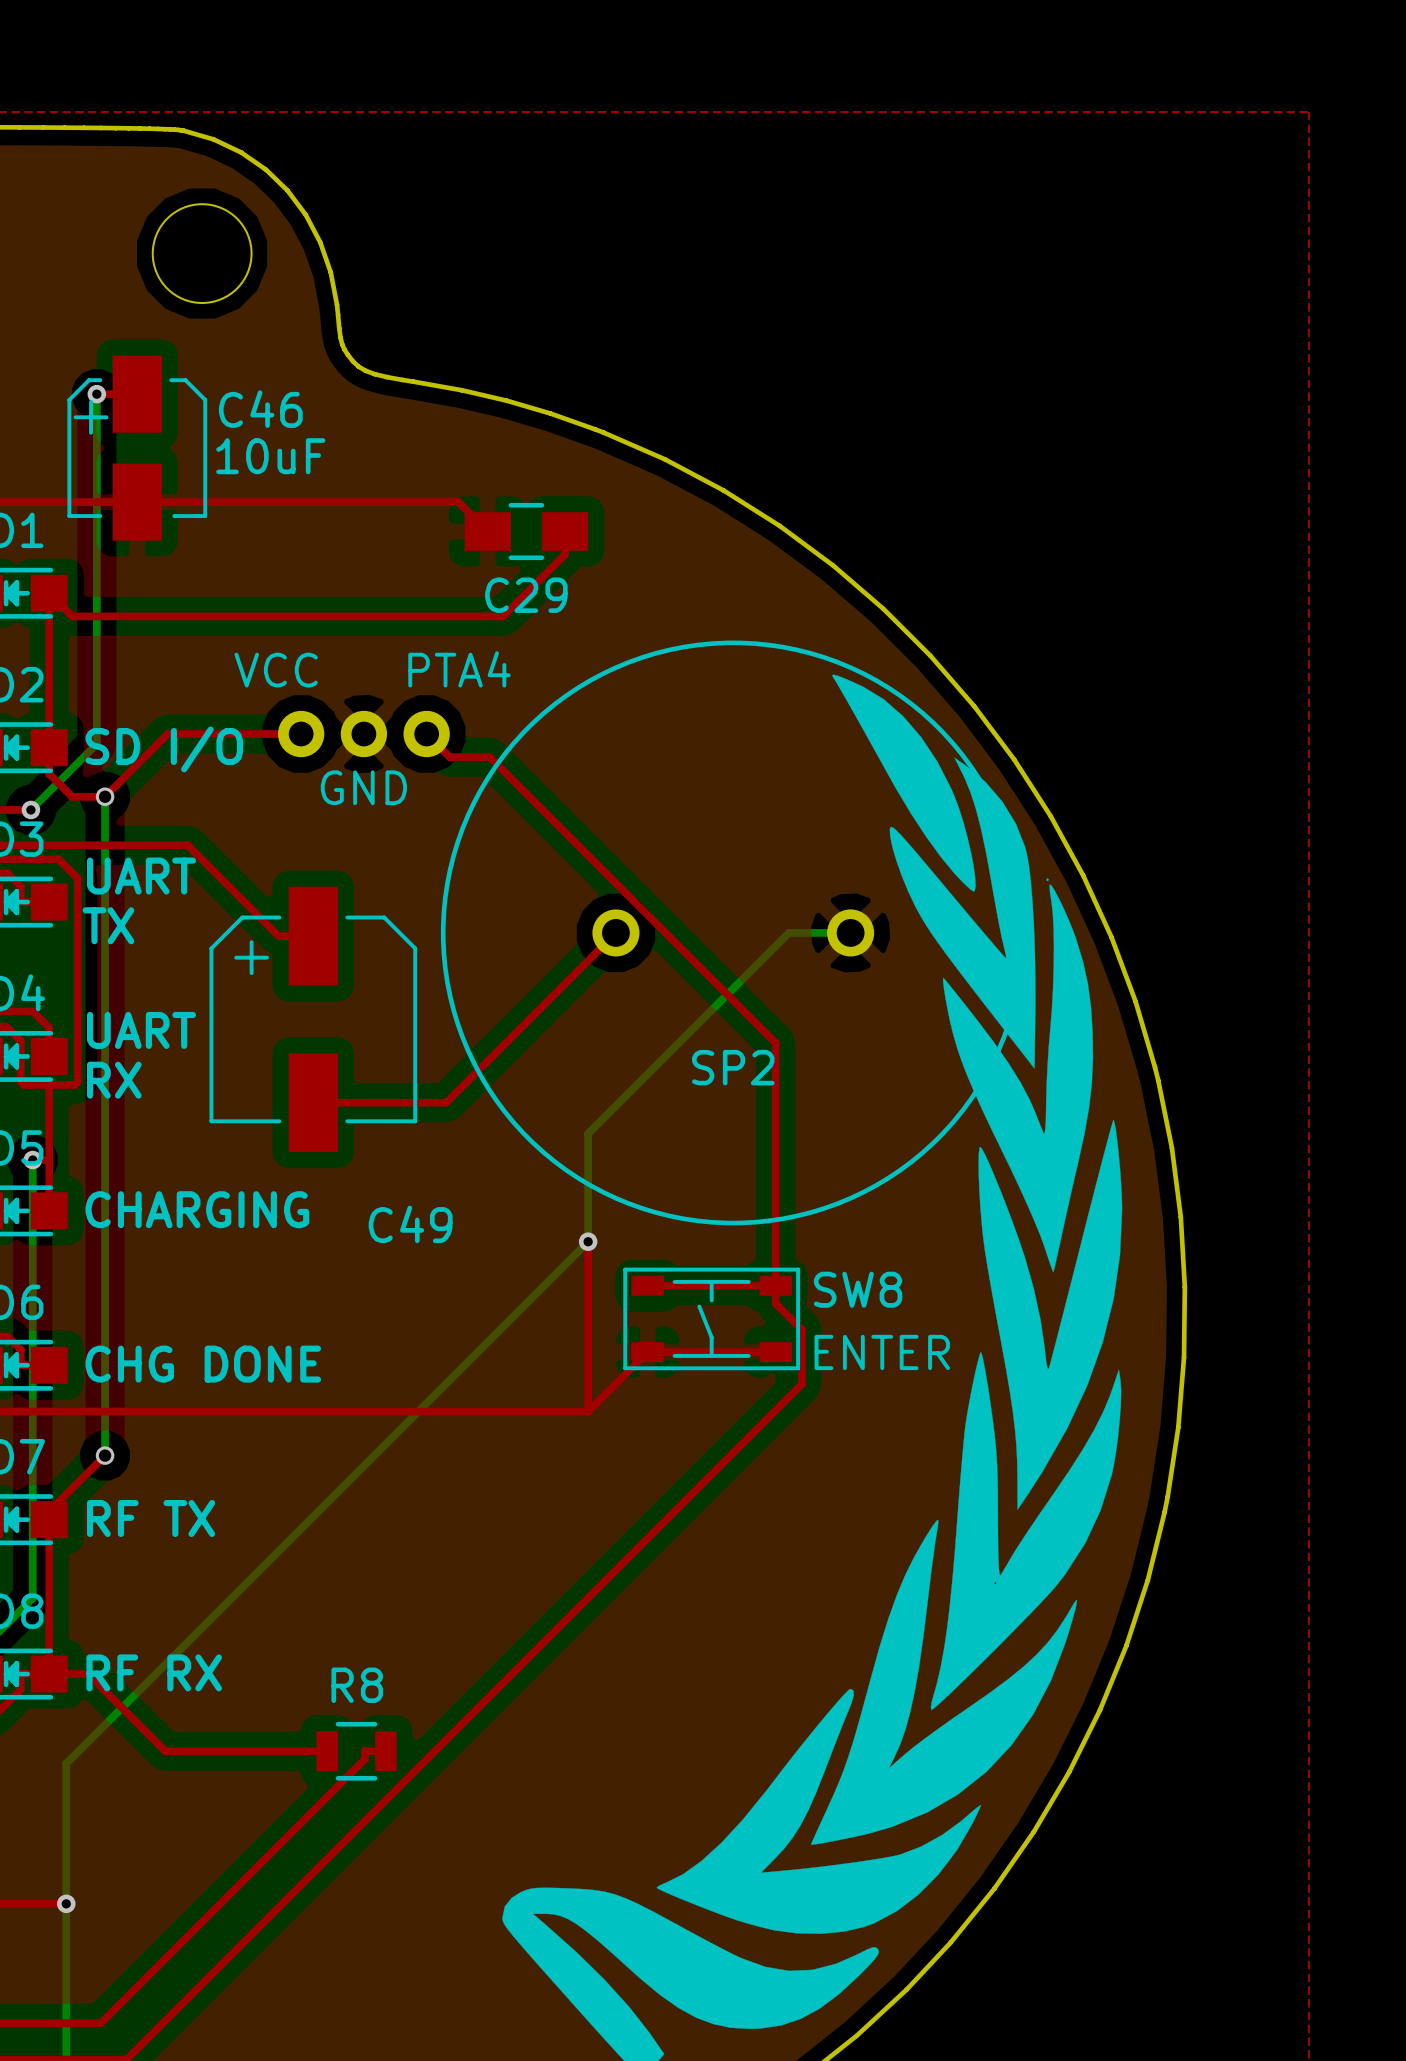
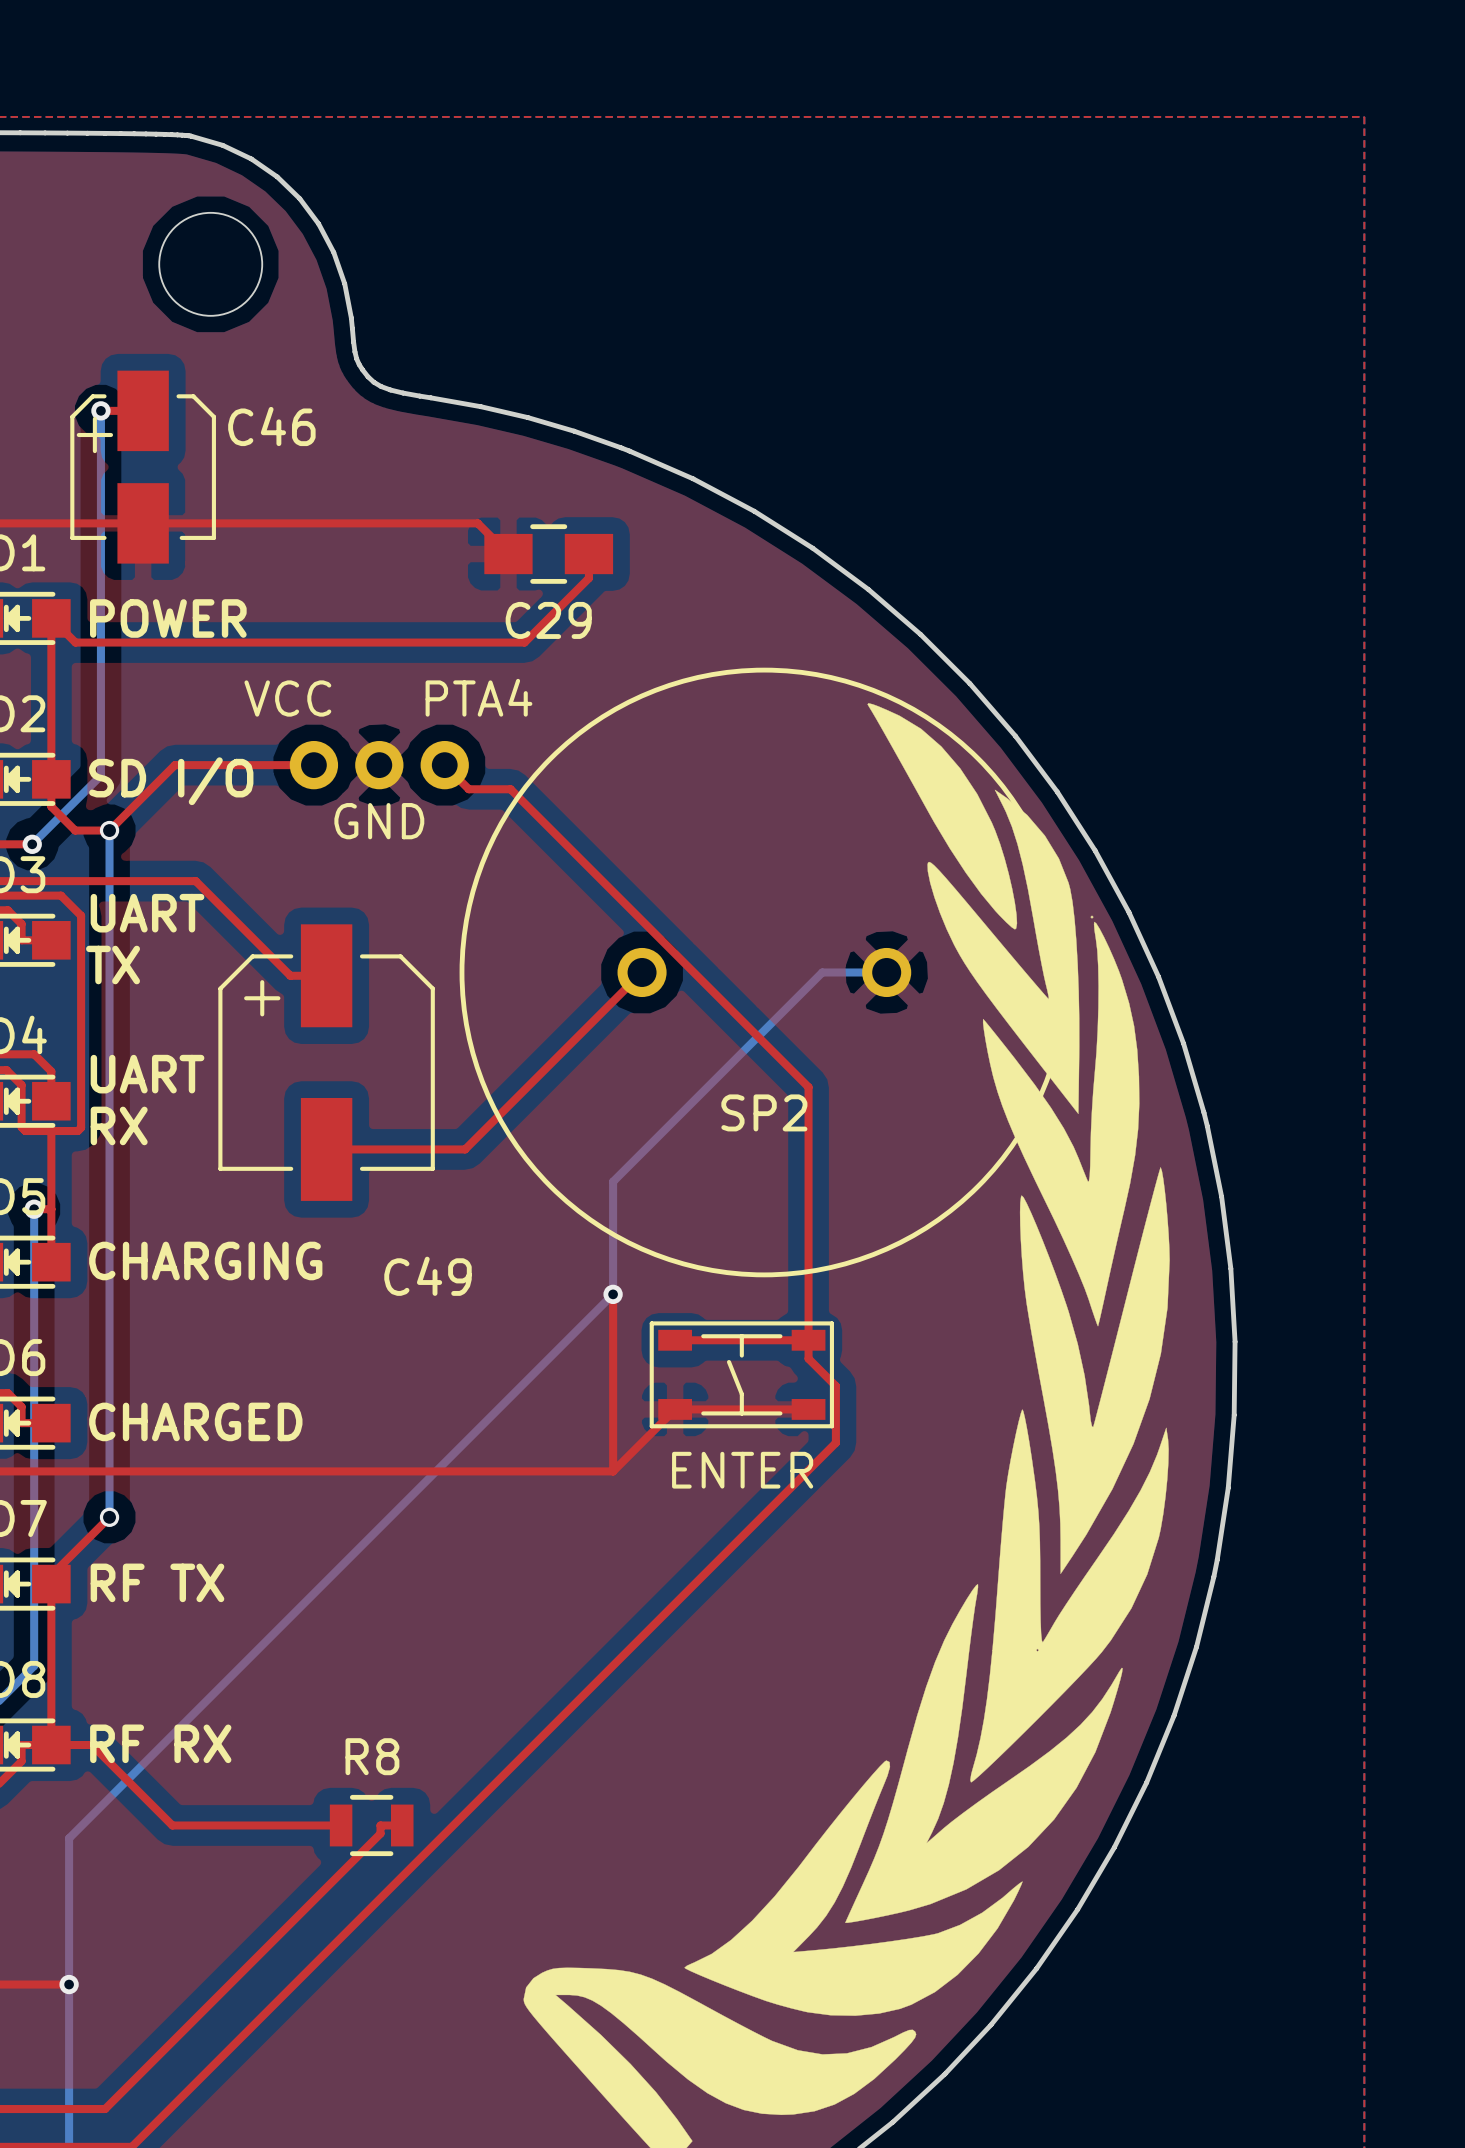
C46 value: 10uF (270, 456) -> none
text: none -> POWER (168, 618)
SW8 name: SW8 (858, 1289) -> none
SW8 value position: ENTER (882, 1352) -> ENTER (742, 1470)
text: CHG DONE (203, 1364) -> CHARGED (195, 1421)

